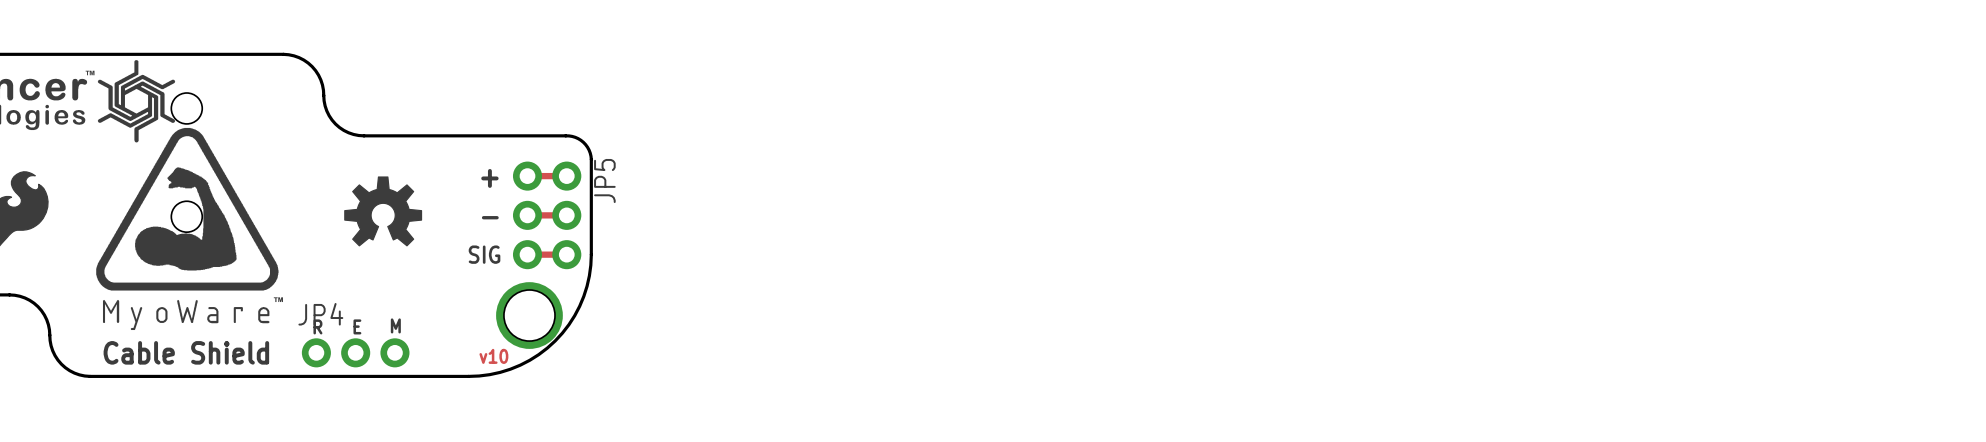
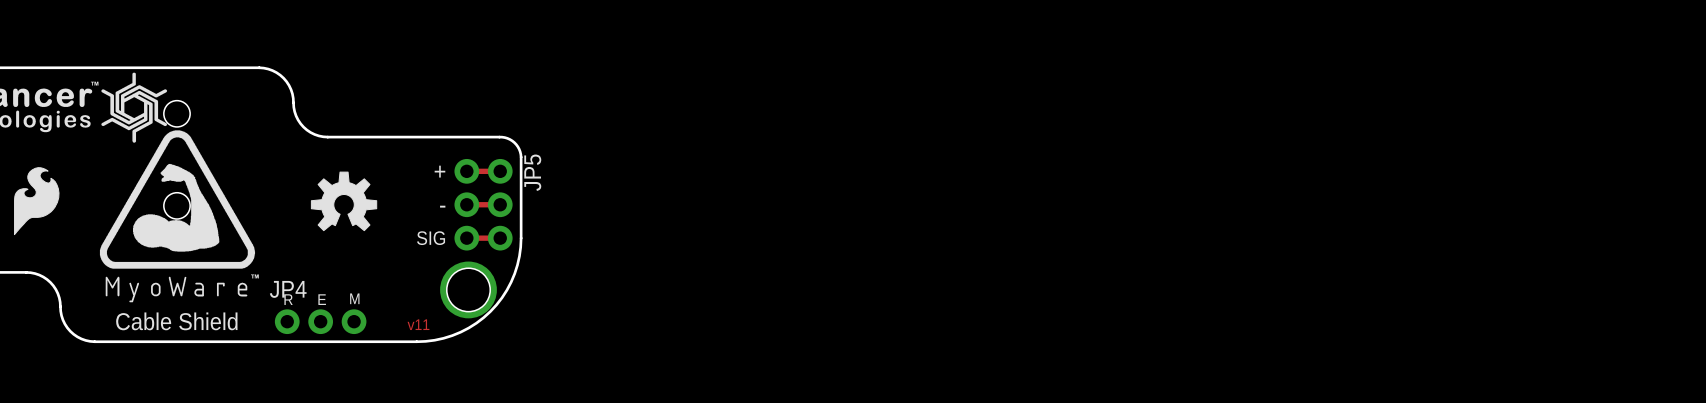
text: v10 (493, 356) -> v11 (418, 324)

